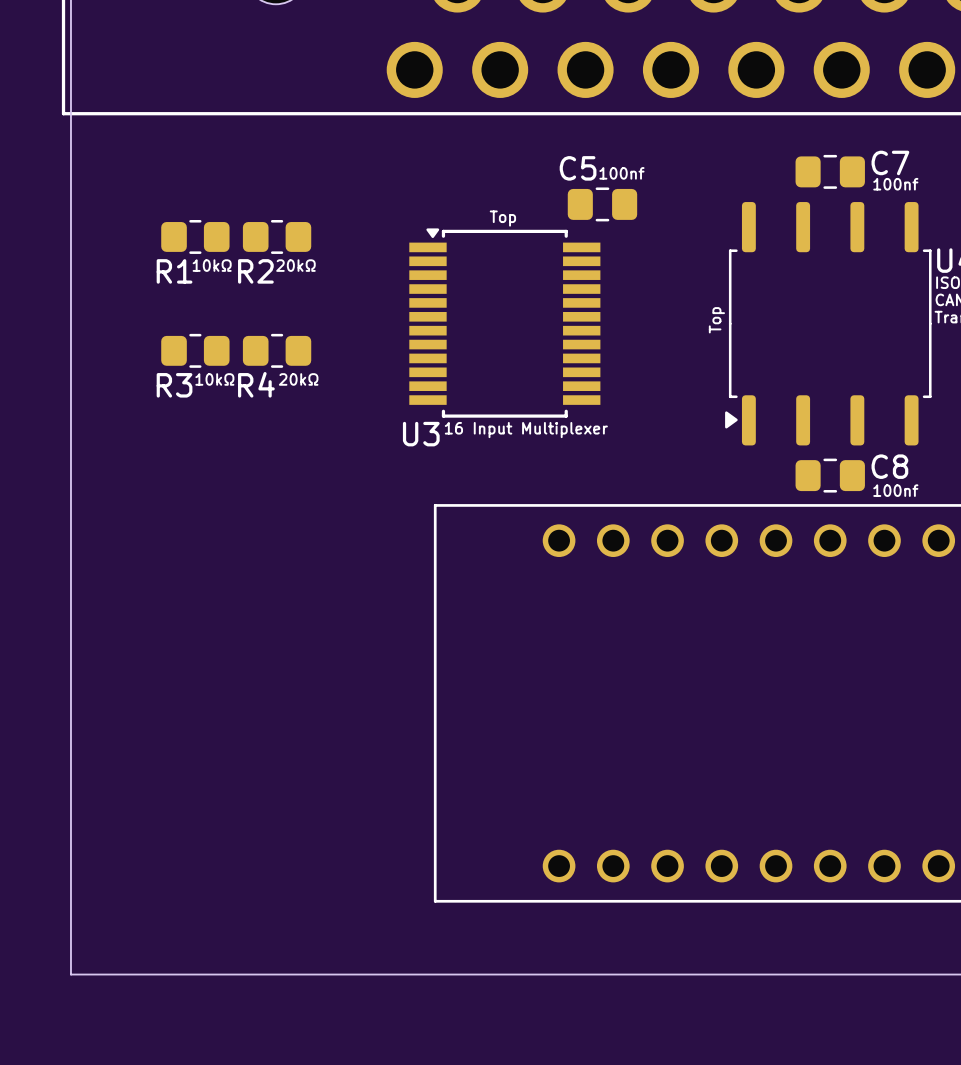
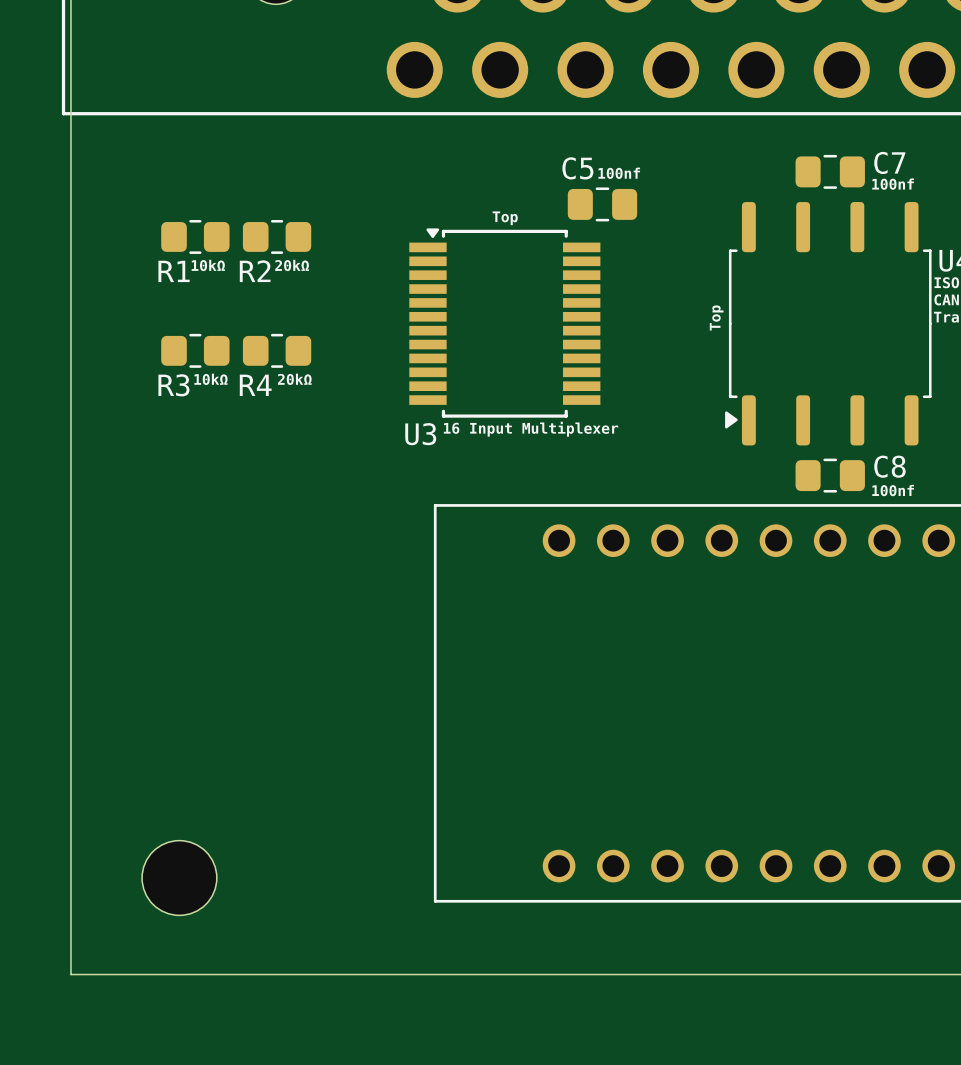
part: none -> (179, 878)

